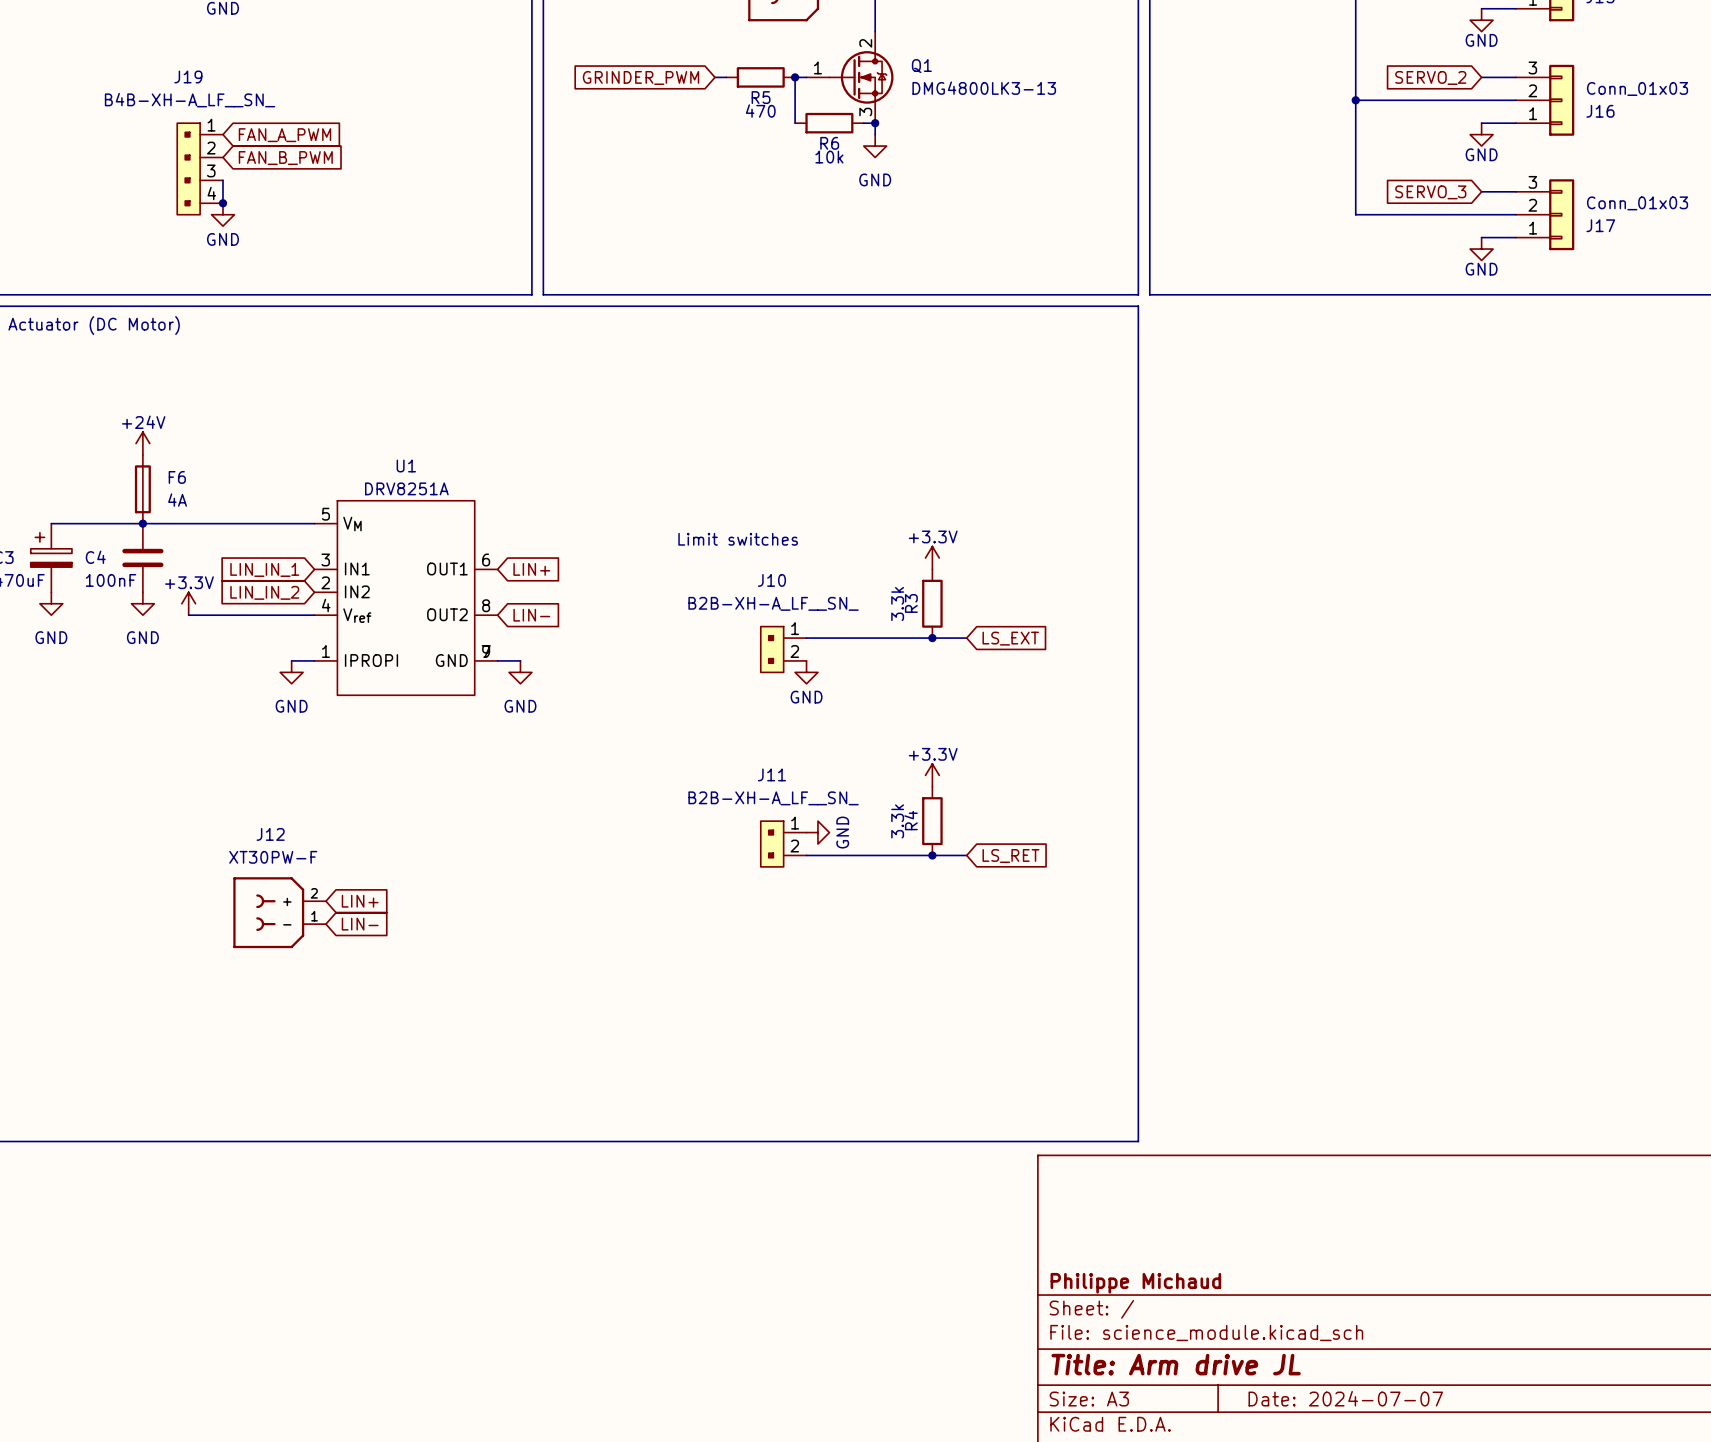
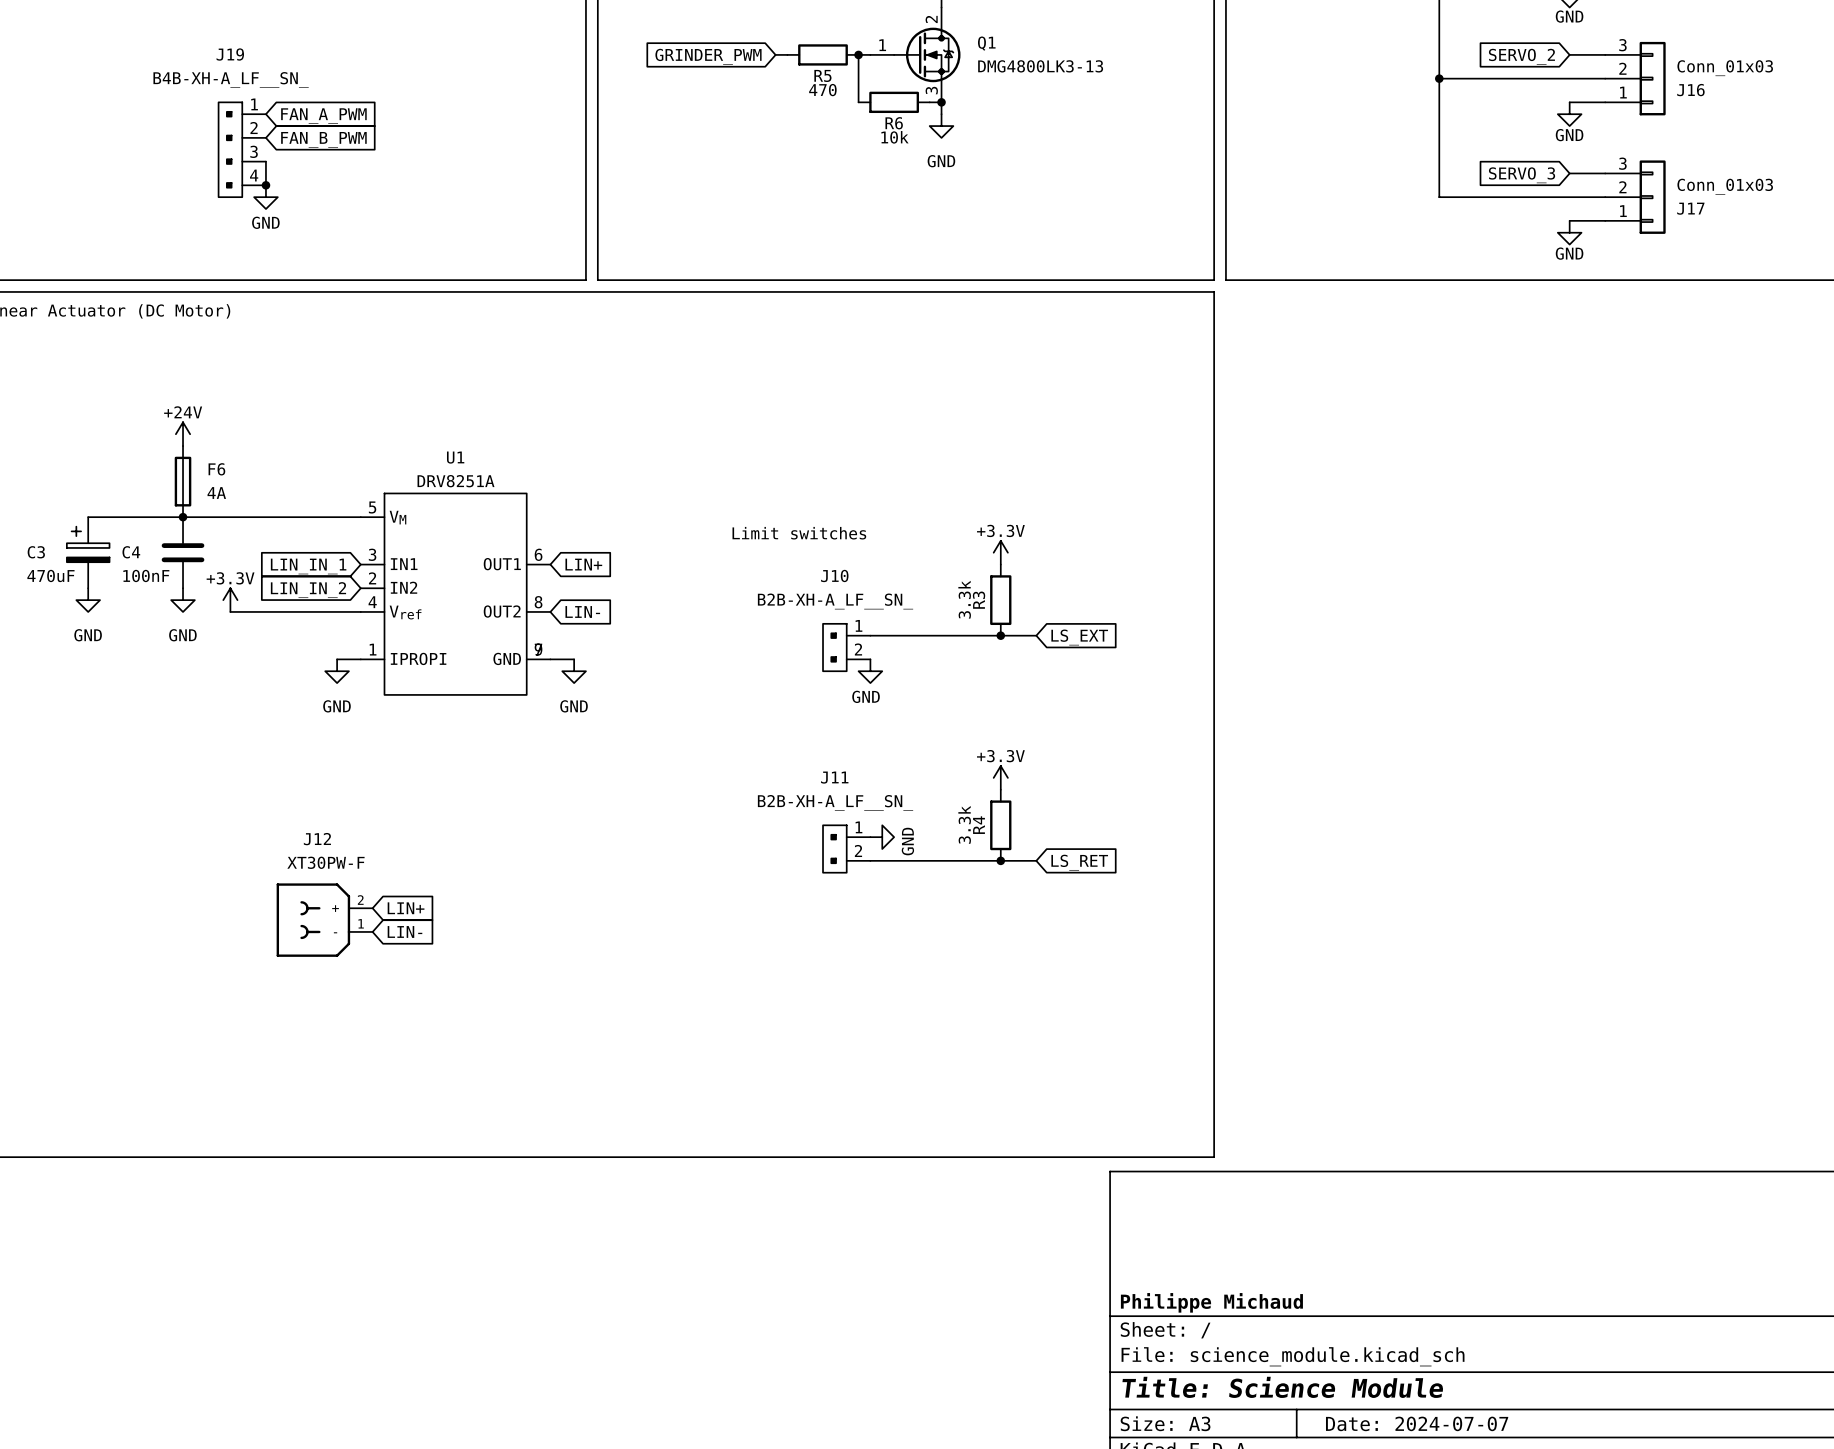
title block: Title: Arm drive JL (1176, 1364) -> Title: Science Module (1282, 1387)

